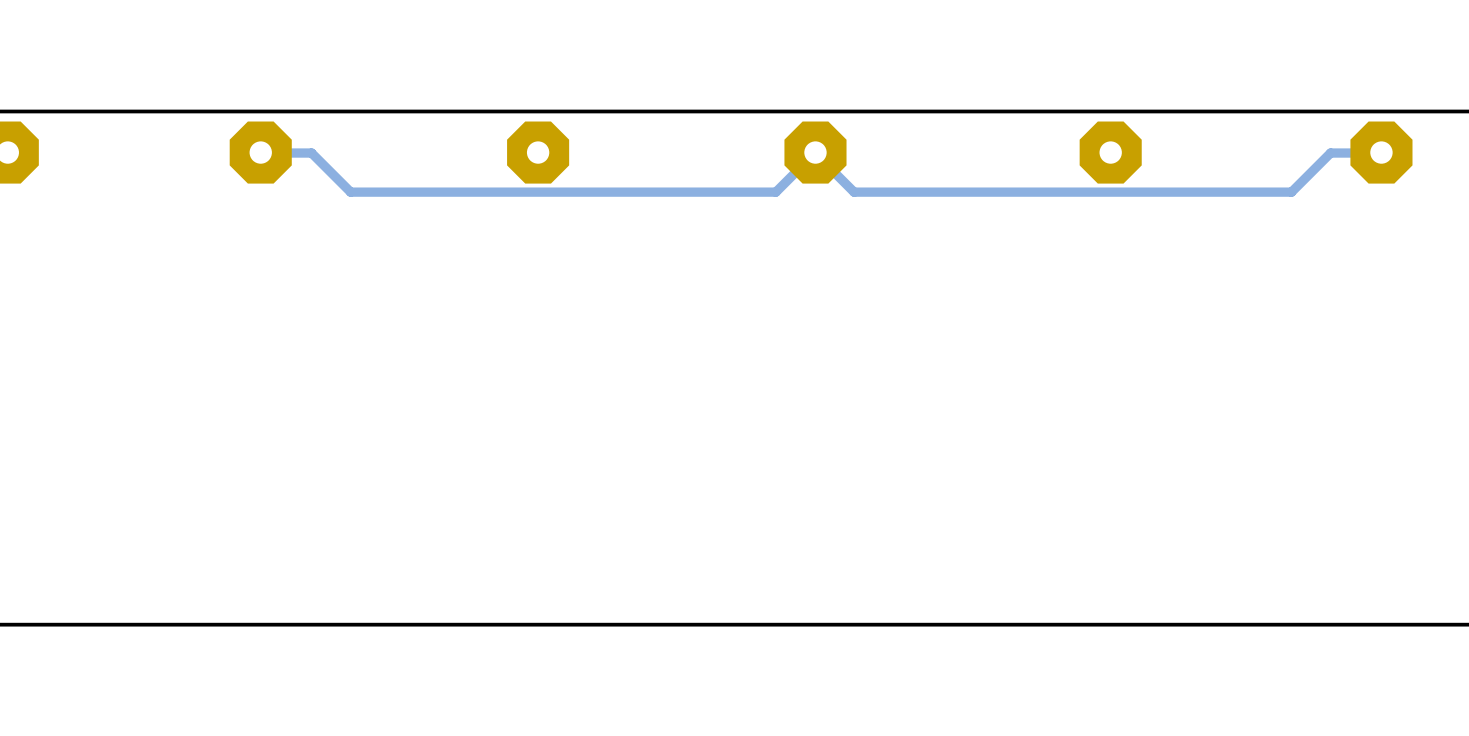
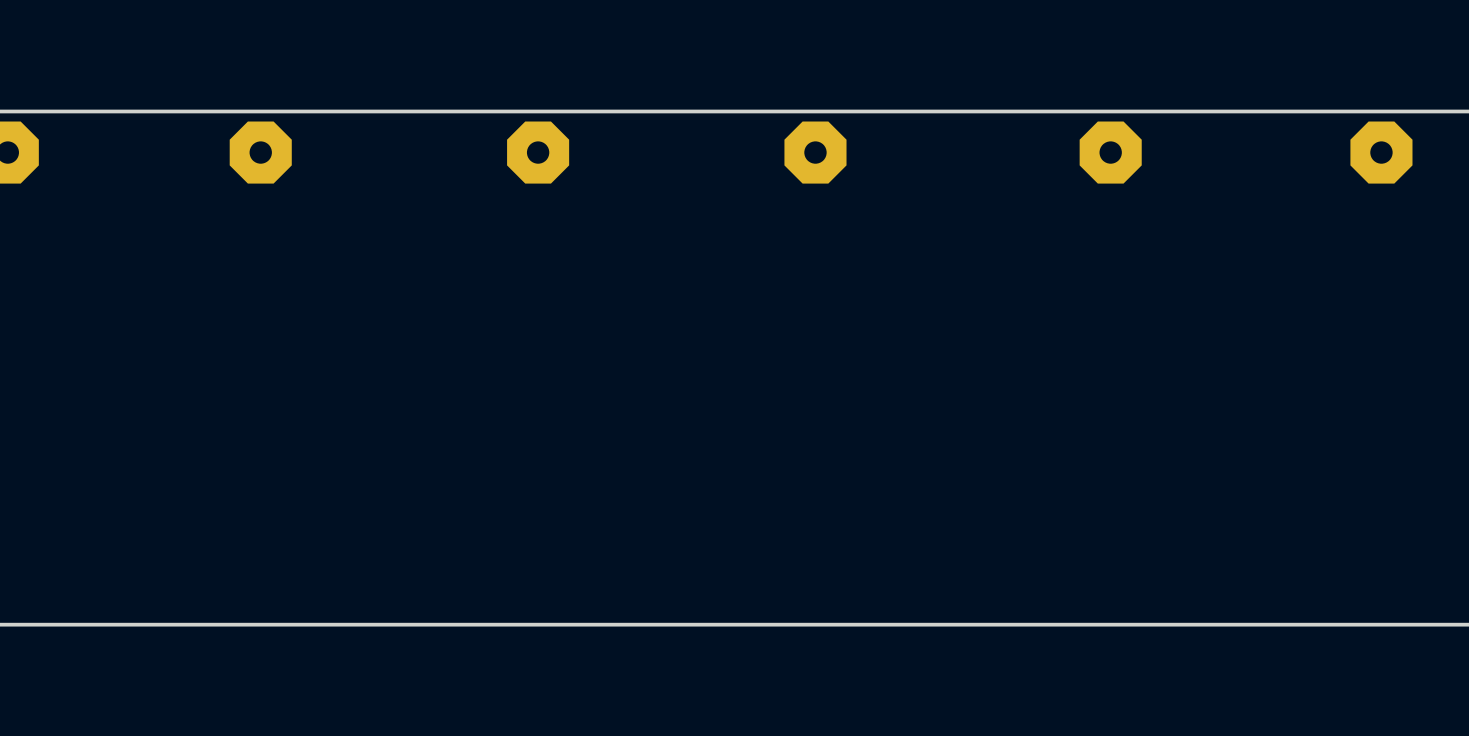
track: (1381, 152) (1330, 153) (1291, 192) (854, 192) (815, 152) (775, 192) (350, 192) (311, 153) (260, 152) -> none

